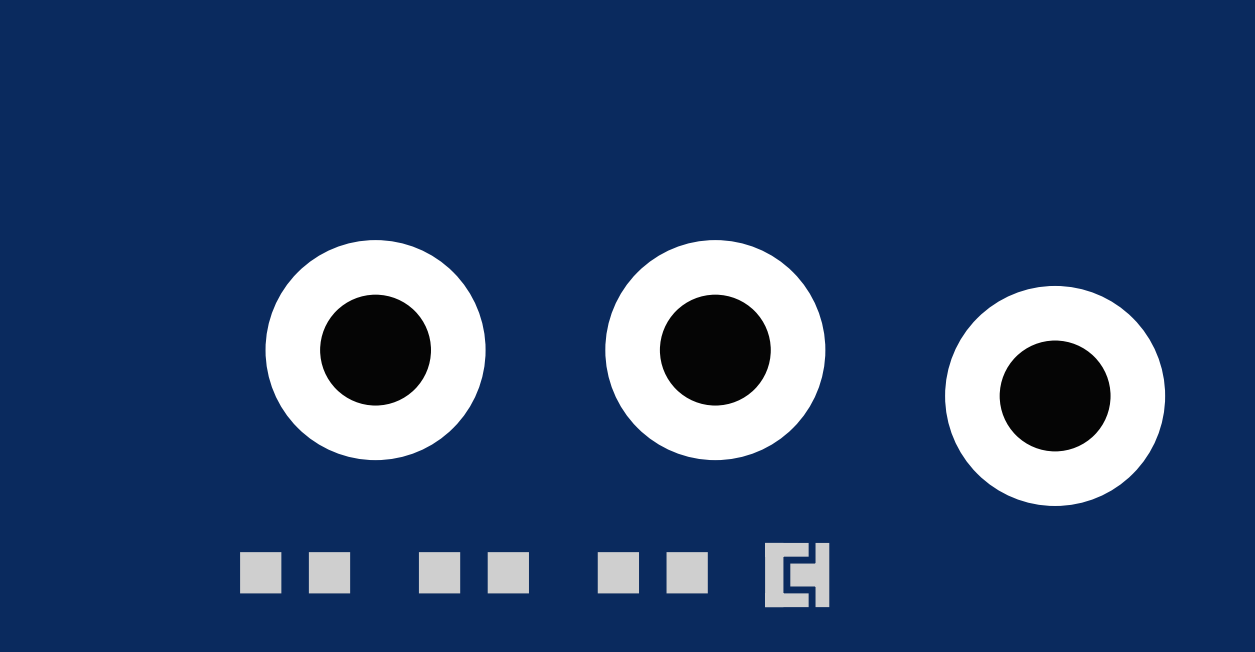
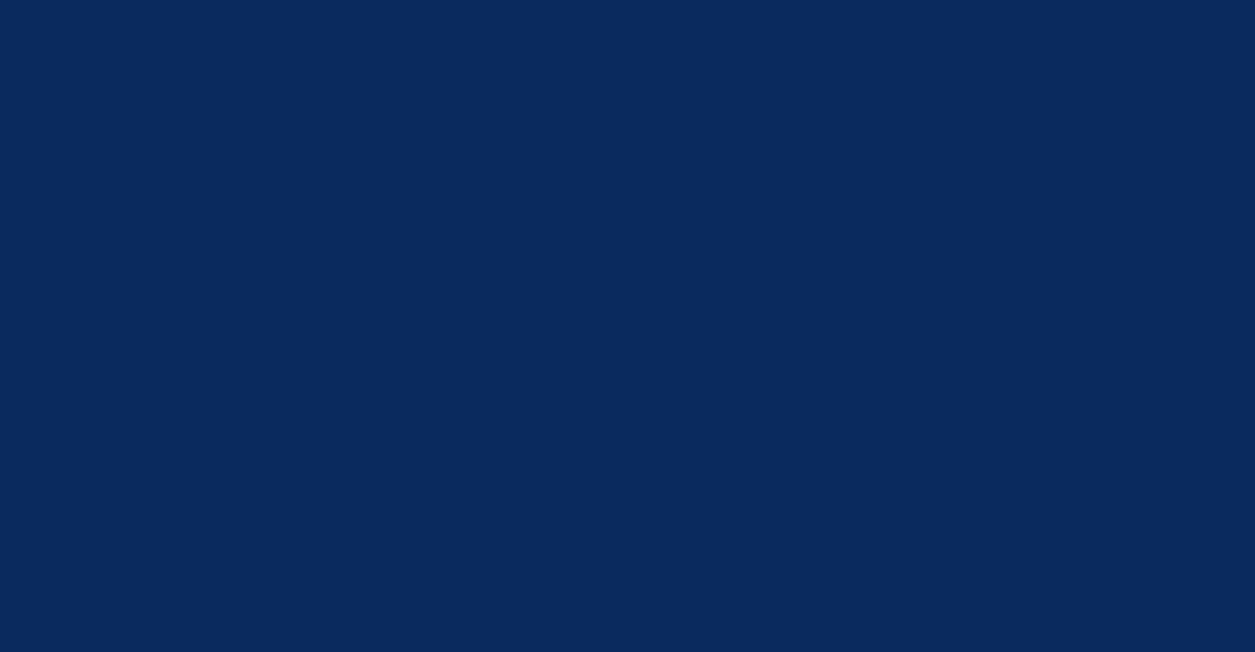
part: (375, 350) -> none
part: (715, 350) -> none
part: (1055, 395) -> none
part: (295, 572) -> none
part: (473, 572) -> none
part: (652, 572) -> none
part: (797, 575) -> none

